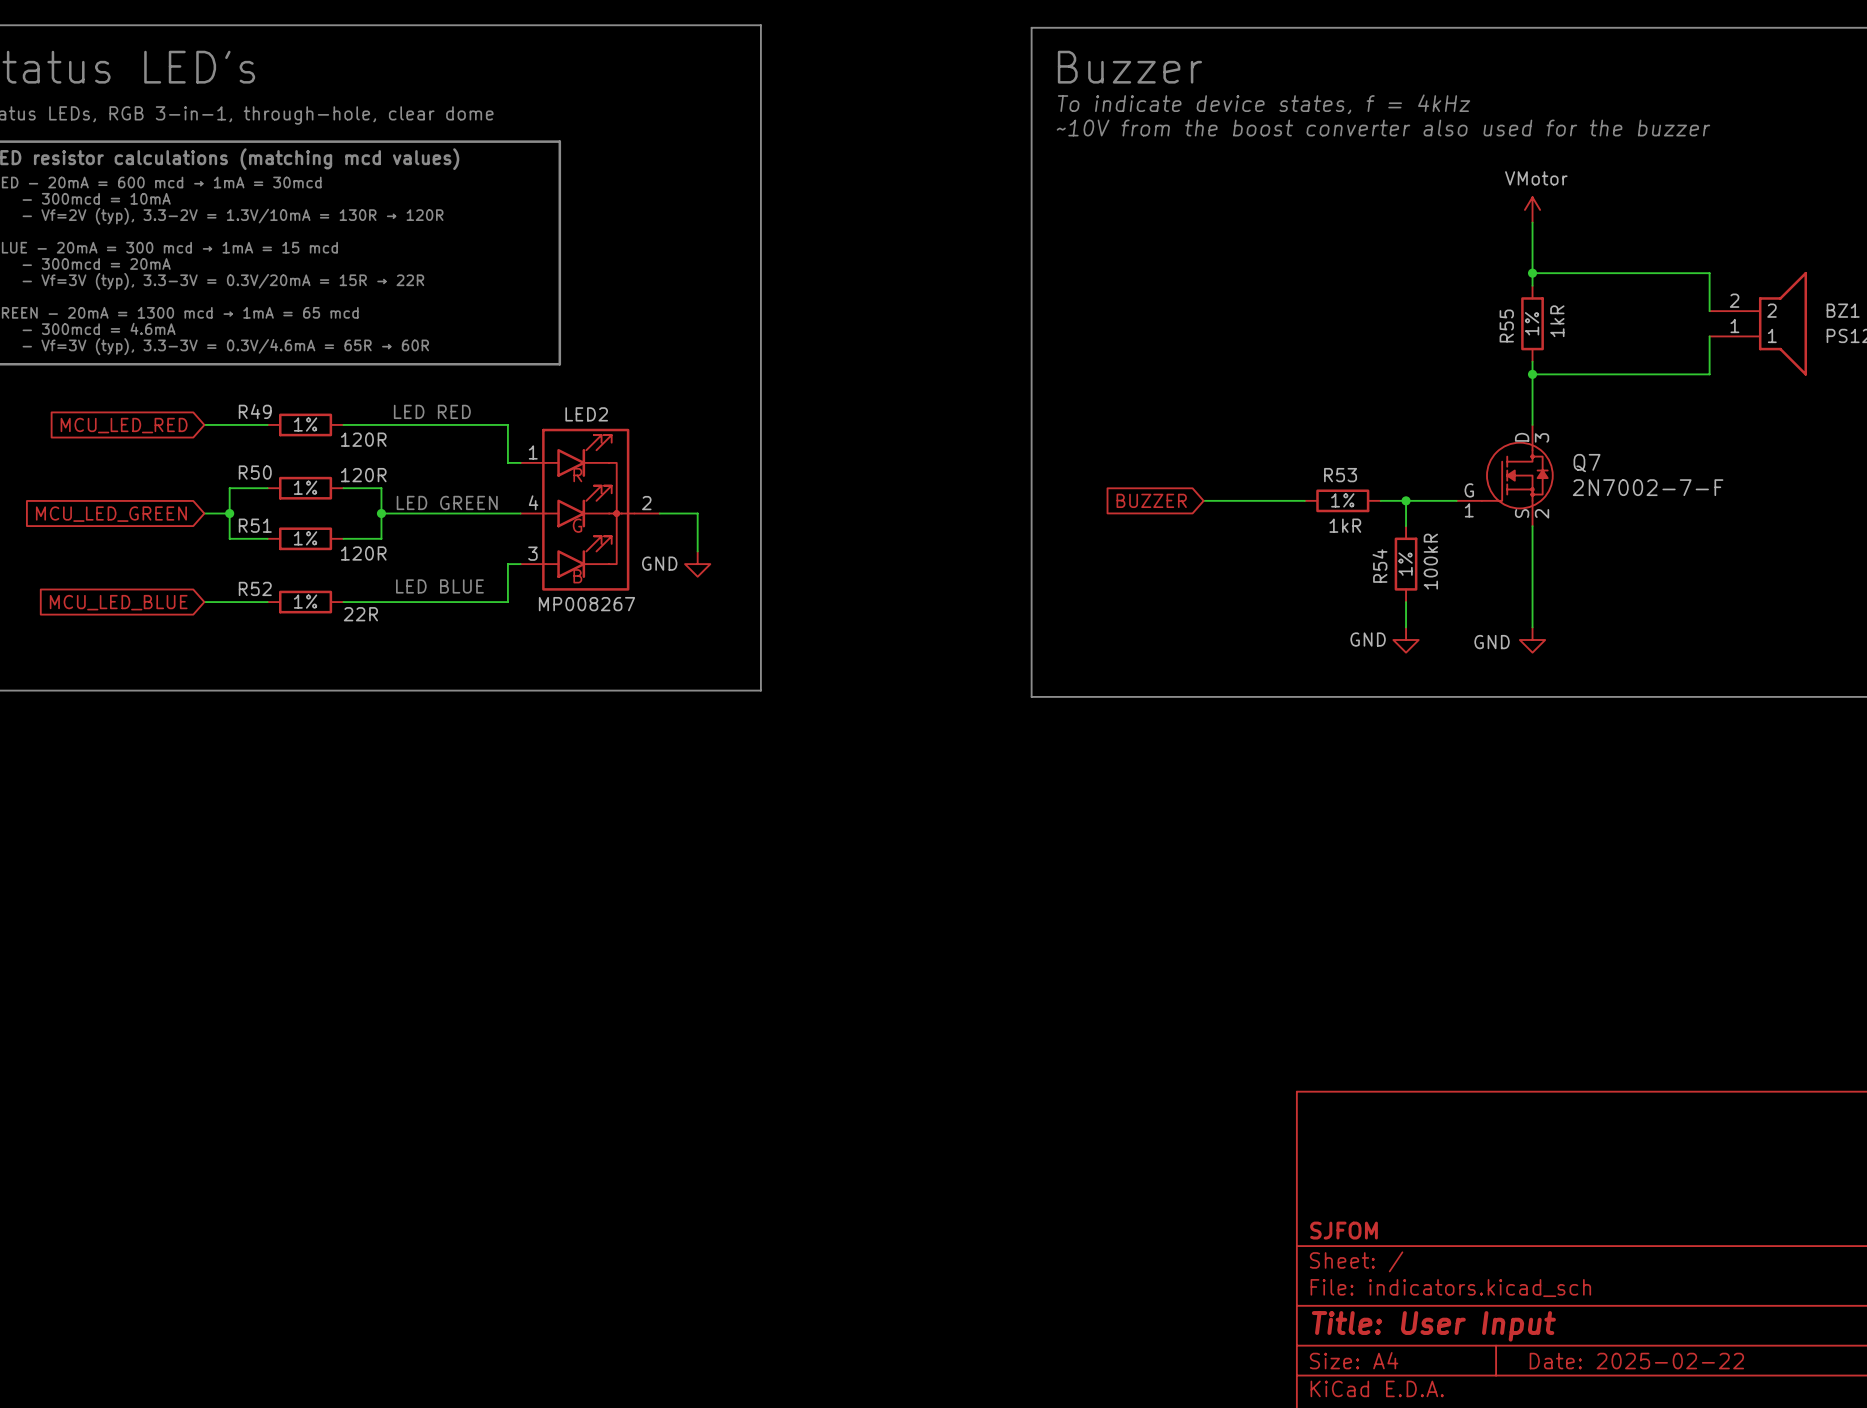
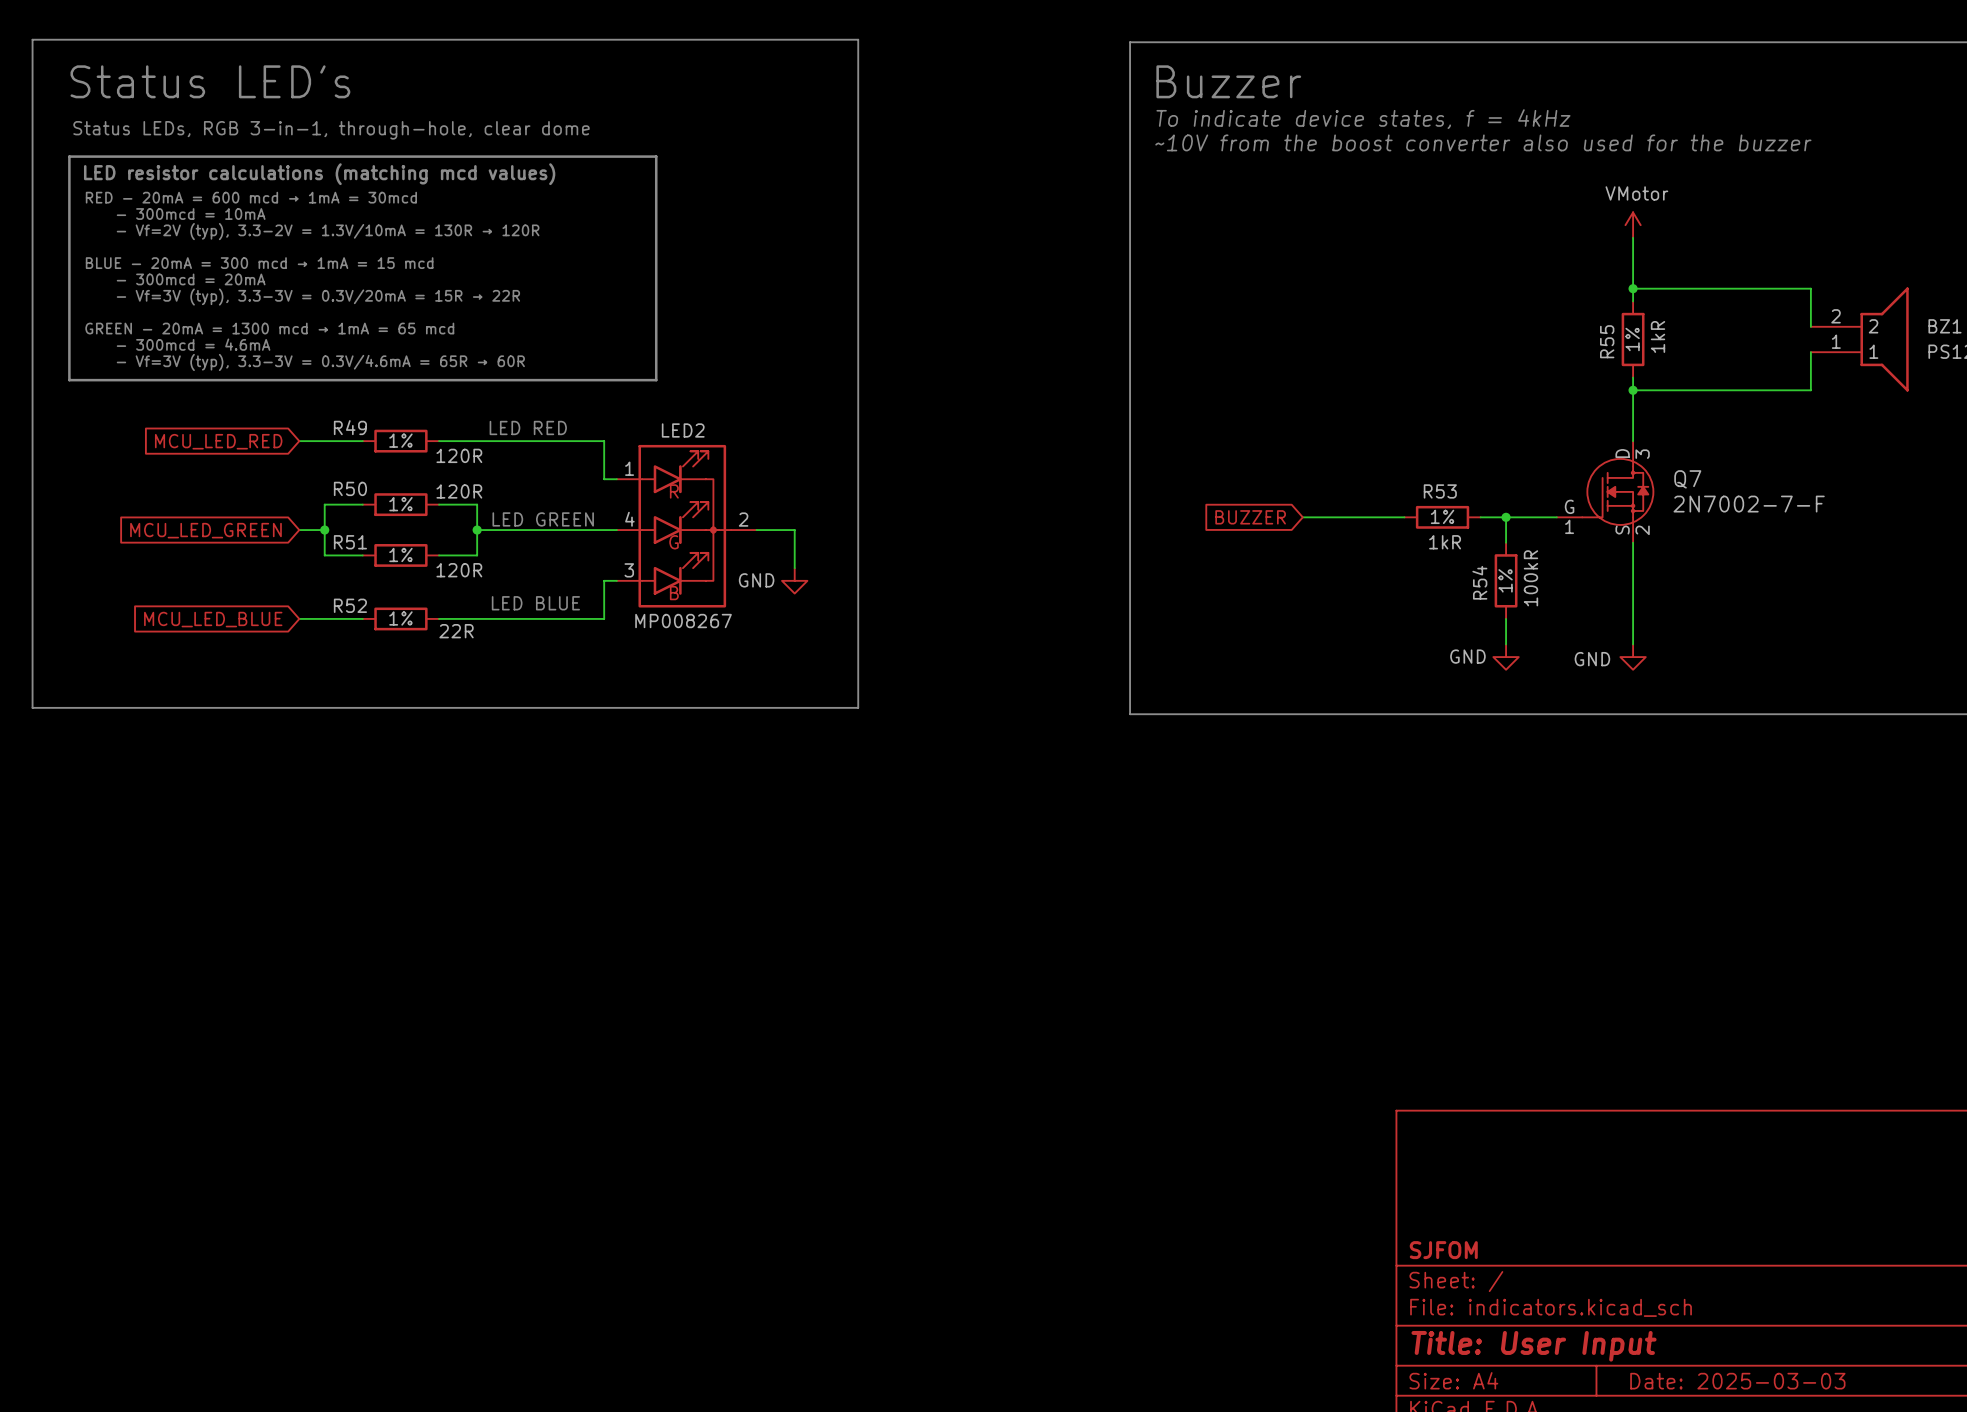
title block: Date: 2025-02-22 (1636, 1361) -> Date: 2025-03-03 (1737, 1381)

